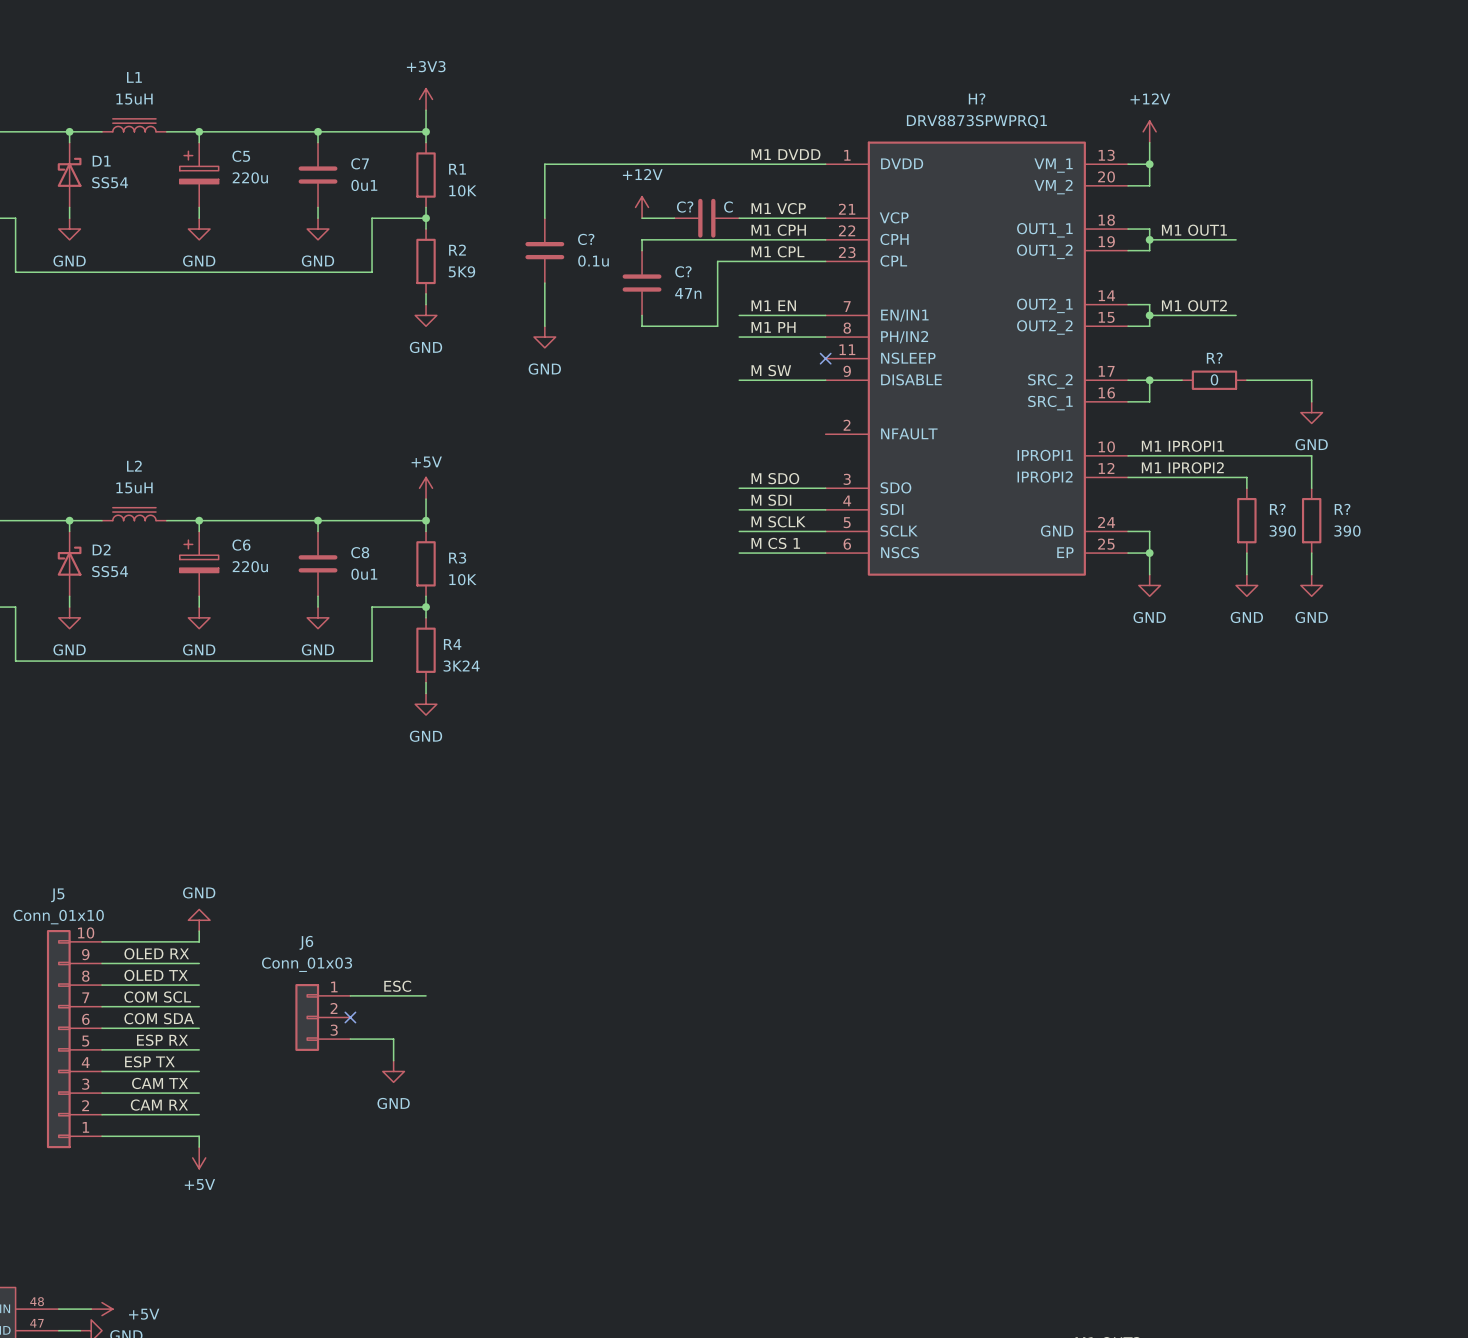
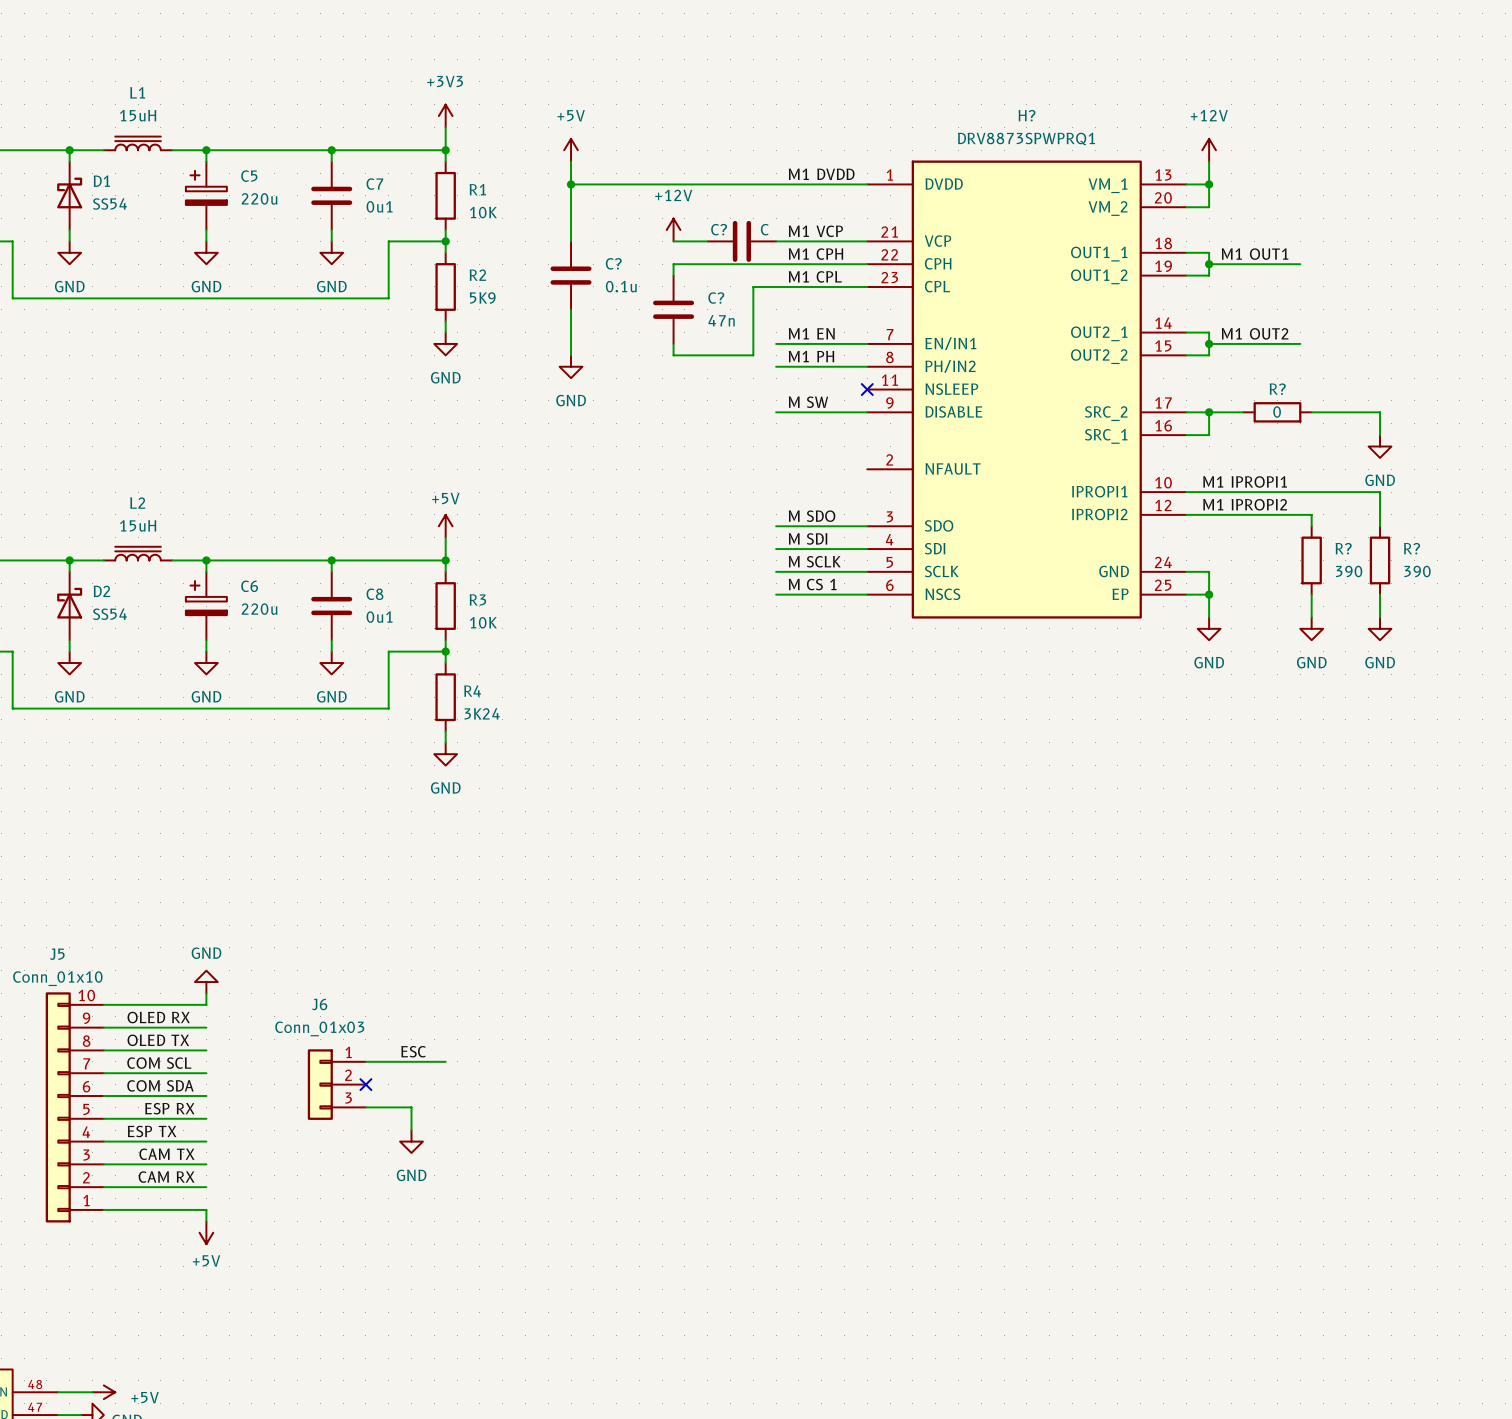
power symbol: none -> +5V (571, 150)
wire: none -> (571, 161) (571, 184)
junction: none -> (571, 184)

